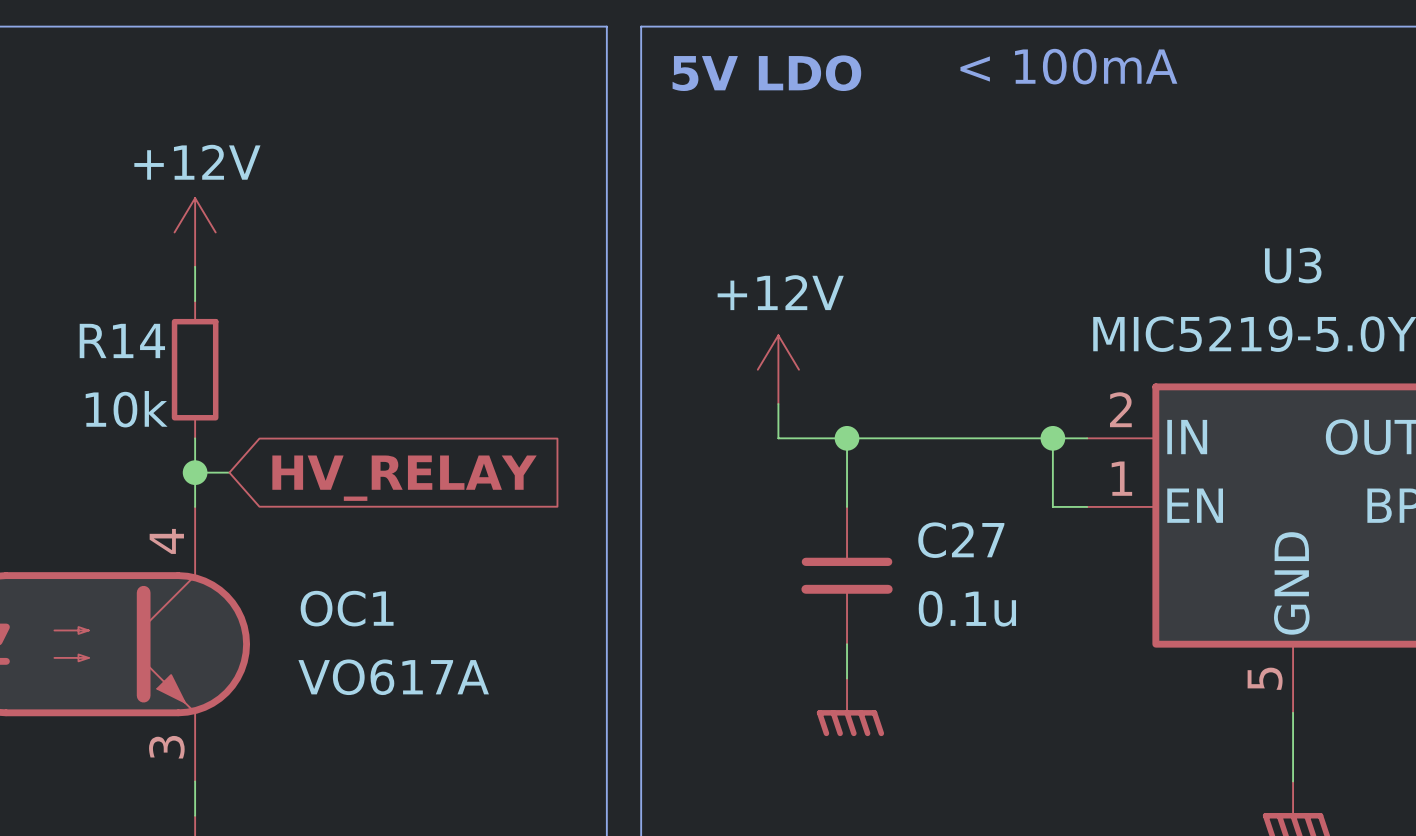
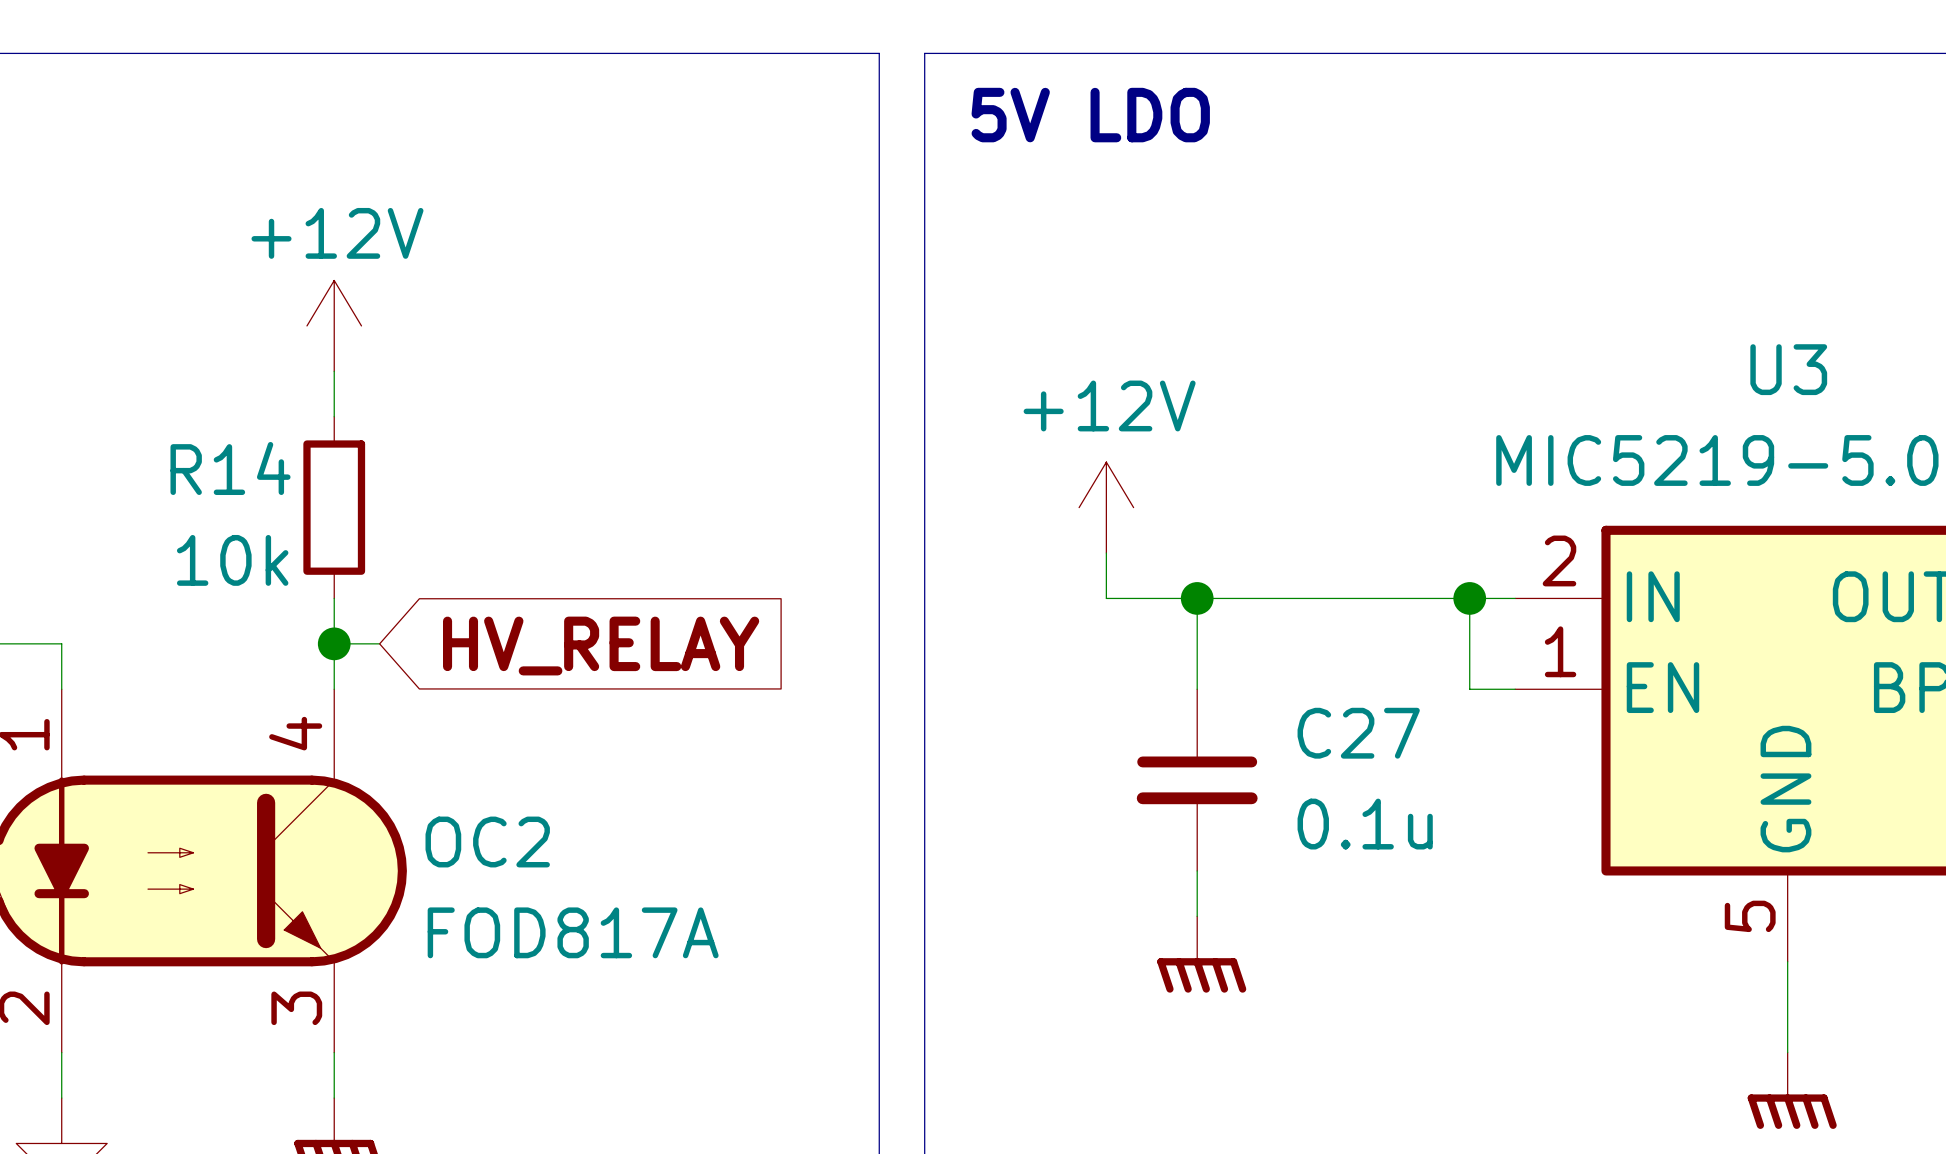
text: < 100mA (1068, 66) -> none
OC1 name: OC1 (347, 608) -> OC2 (487, 842)
OC1 value: VO617A (393, 677) -> FOD817A (573, 932)

